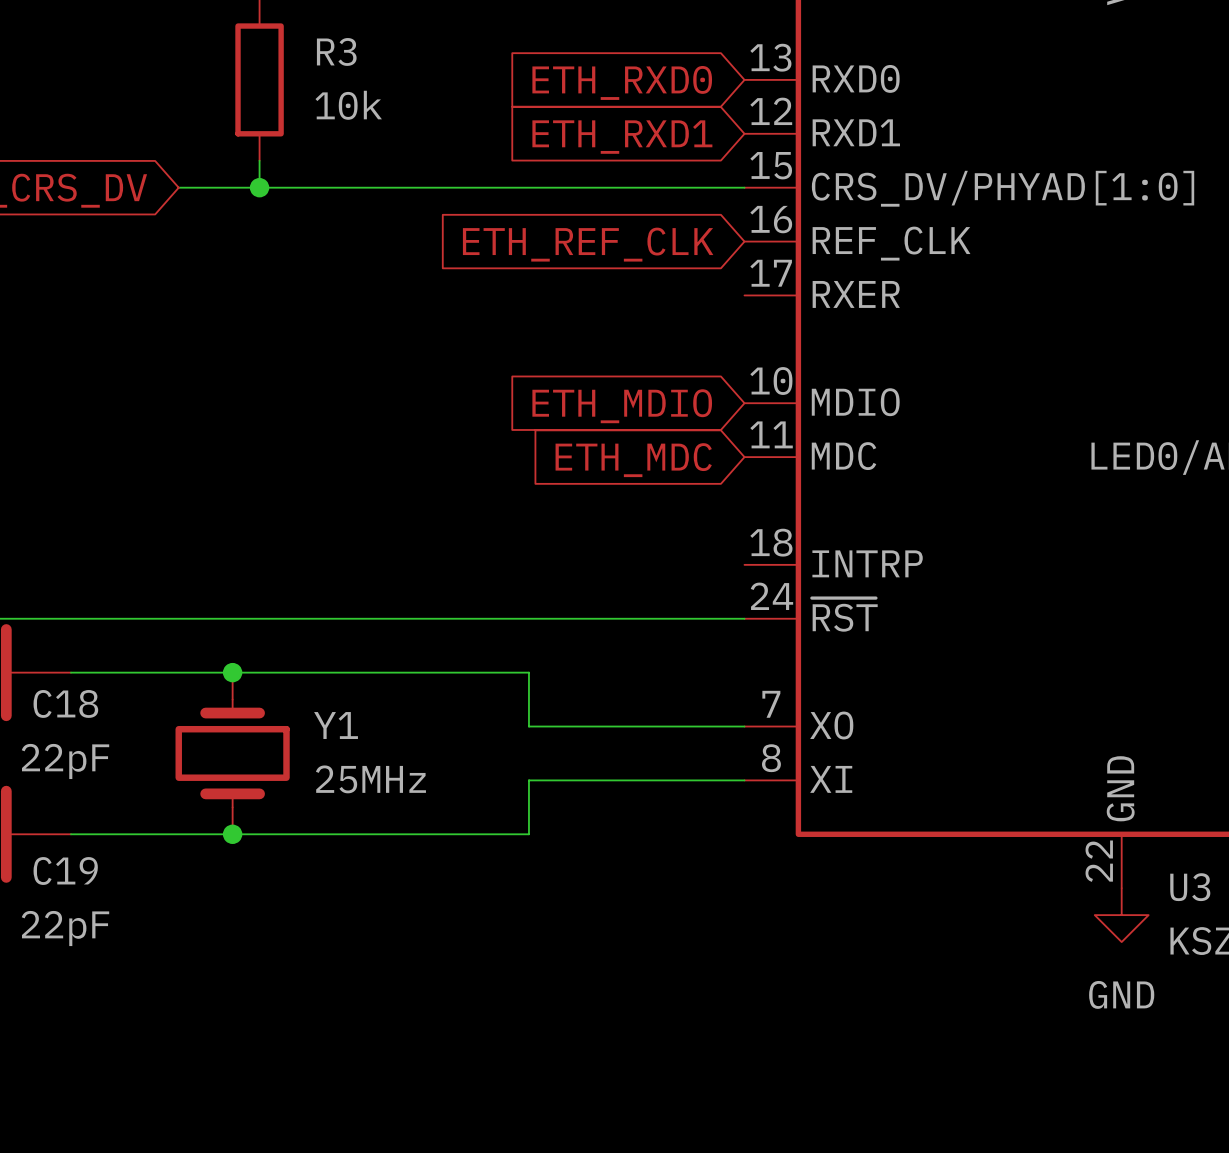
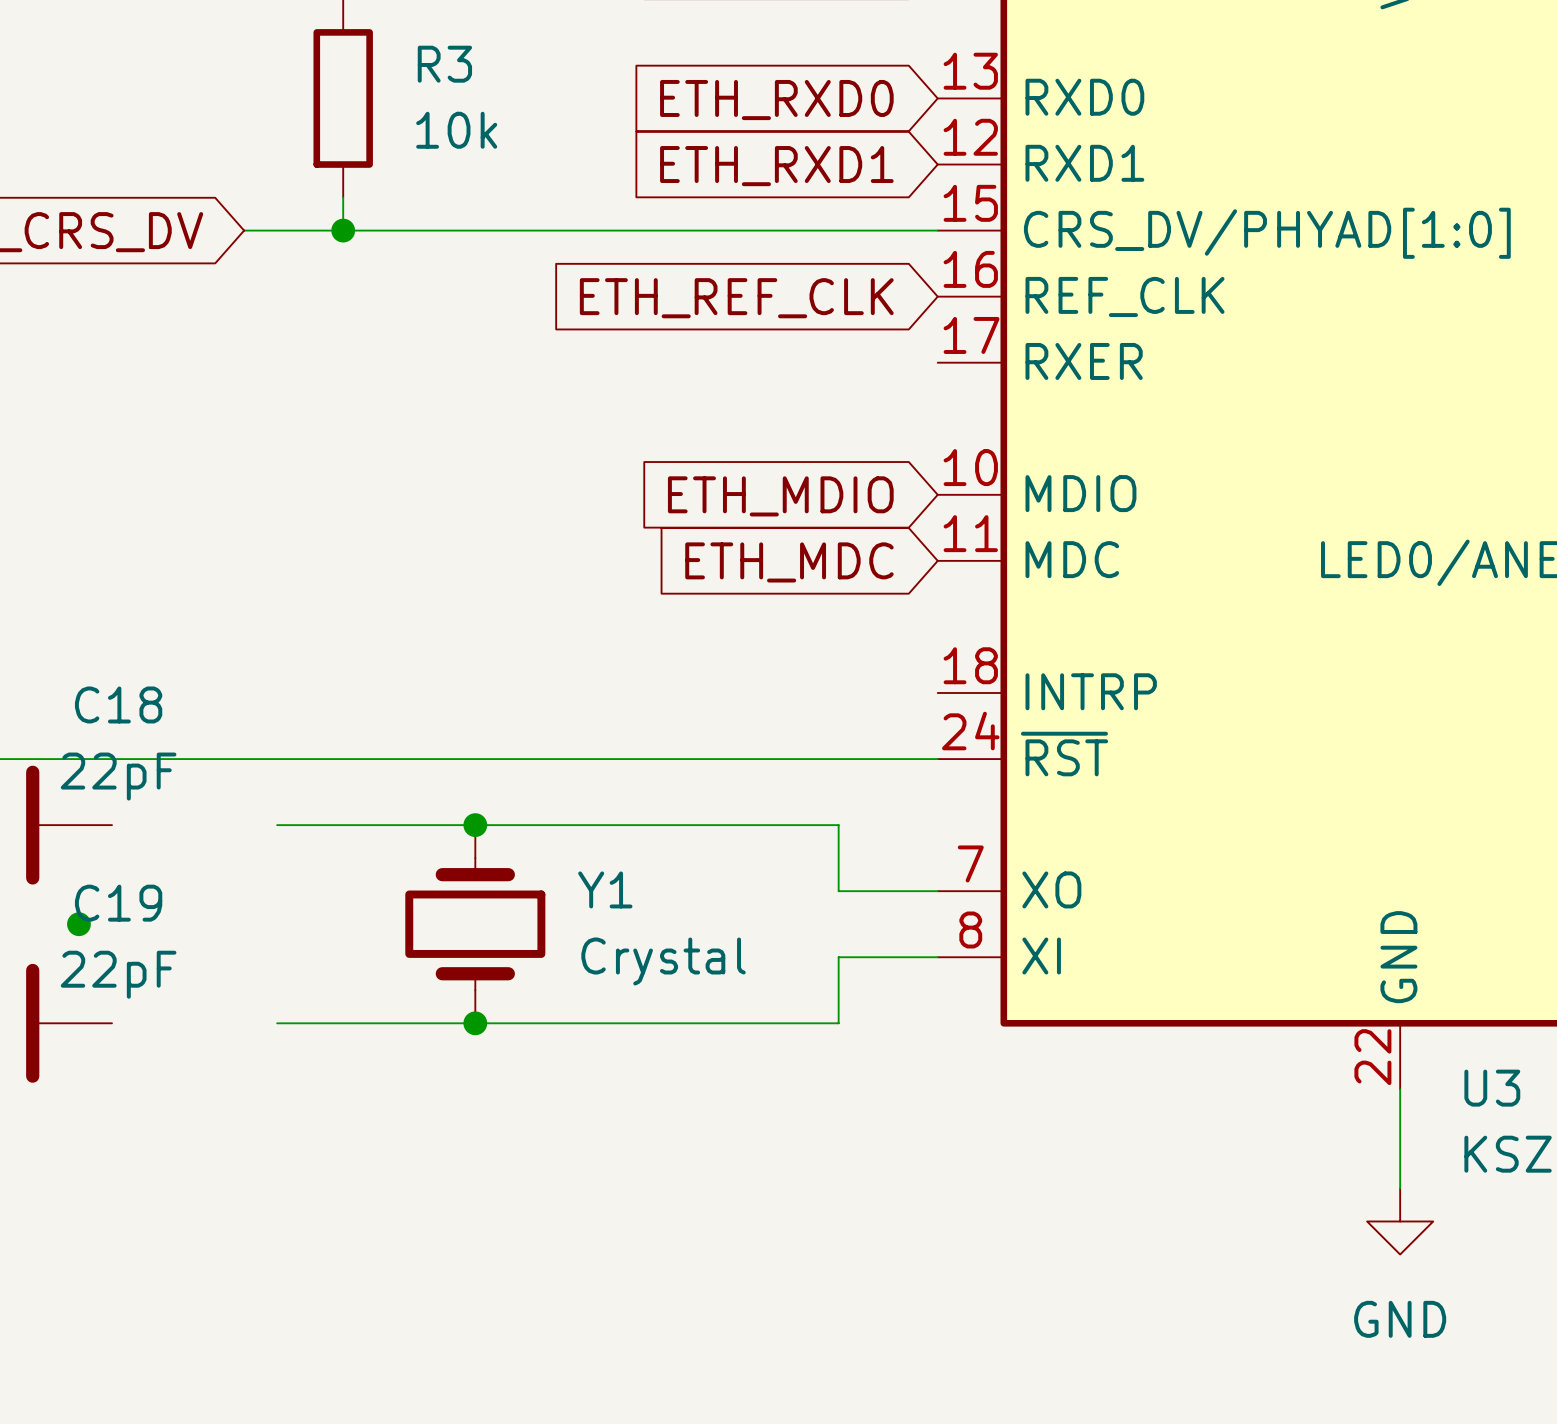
wire: (70, 672) (205, 672) -> none
junction: (232, 672) -> none
junction: none -> (475, 825)
wire: (528, 672) (528, 726) (663, 726) -> (673, 825) (838, 825) (838, 891)
C18 name position: C18 (65, 703) -> C18 (118, 704)
junction: none -> (78, 924)
Y1 position: (232, 753) -> (475, 924)
C18 value position: 22pF (65, 761) -> 22pF (118, 776)
Y1 value: 25MHz (370, 779) -> Crystal (663, 961)
wire: (663, 780) (528, 780) (528, 834) -> (838, 957) (838, 1023) (673, 1023)
wire: (70, 834) (205, 834) -> none
junction: (232, 834) -> none
junction: none -> (475, 1023)
C19 name position: C19 (65, 870) -> C19 (118, 903)
wire: none -> (1400, 1089) (1400, 1188)
power symbol position: GND (1121, 915) -> GND (1400, 1221)
C19 value position: 22pF (65, 928) -> 22pF (118, 974)

